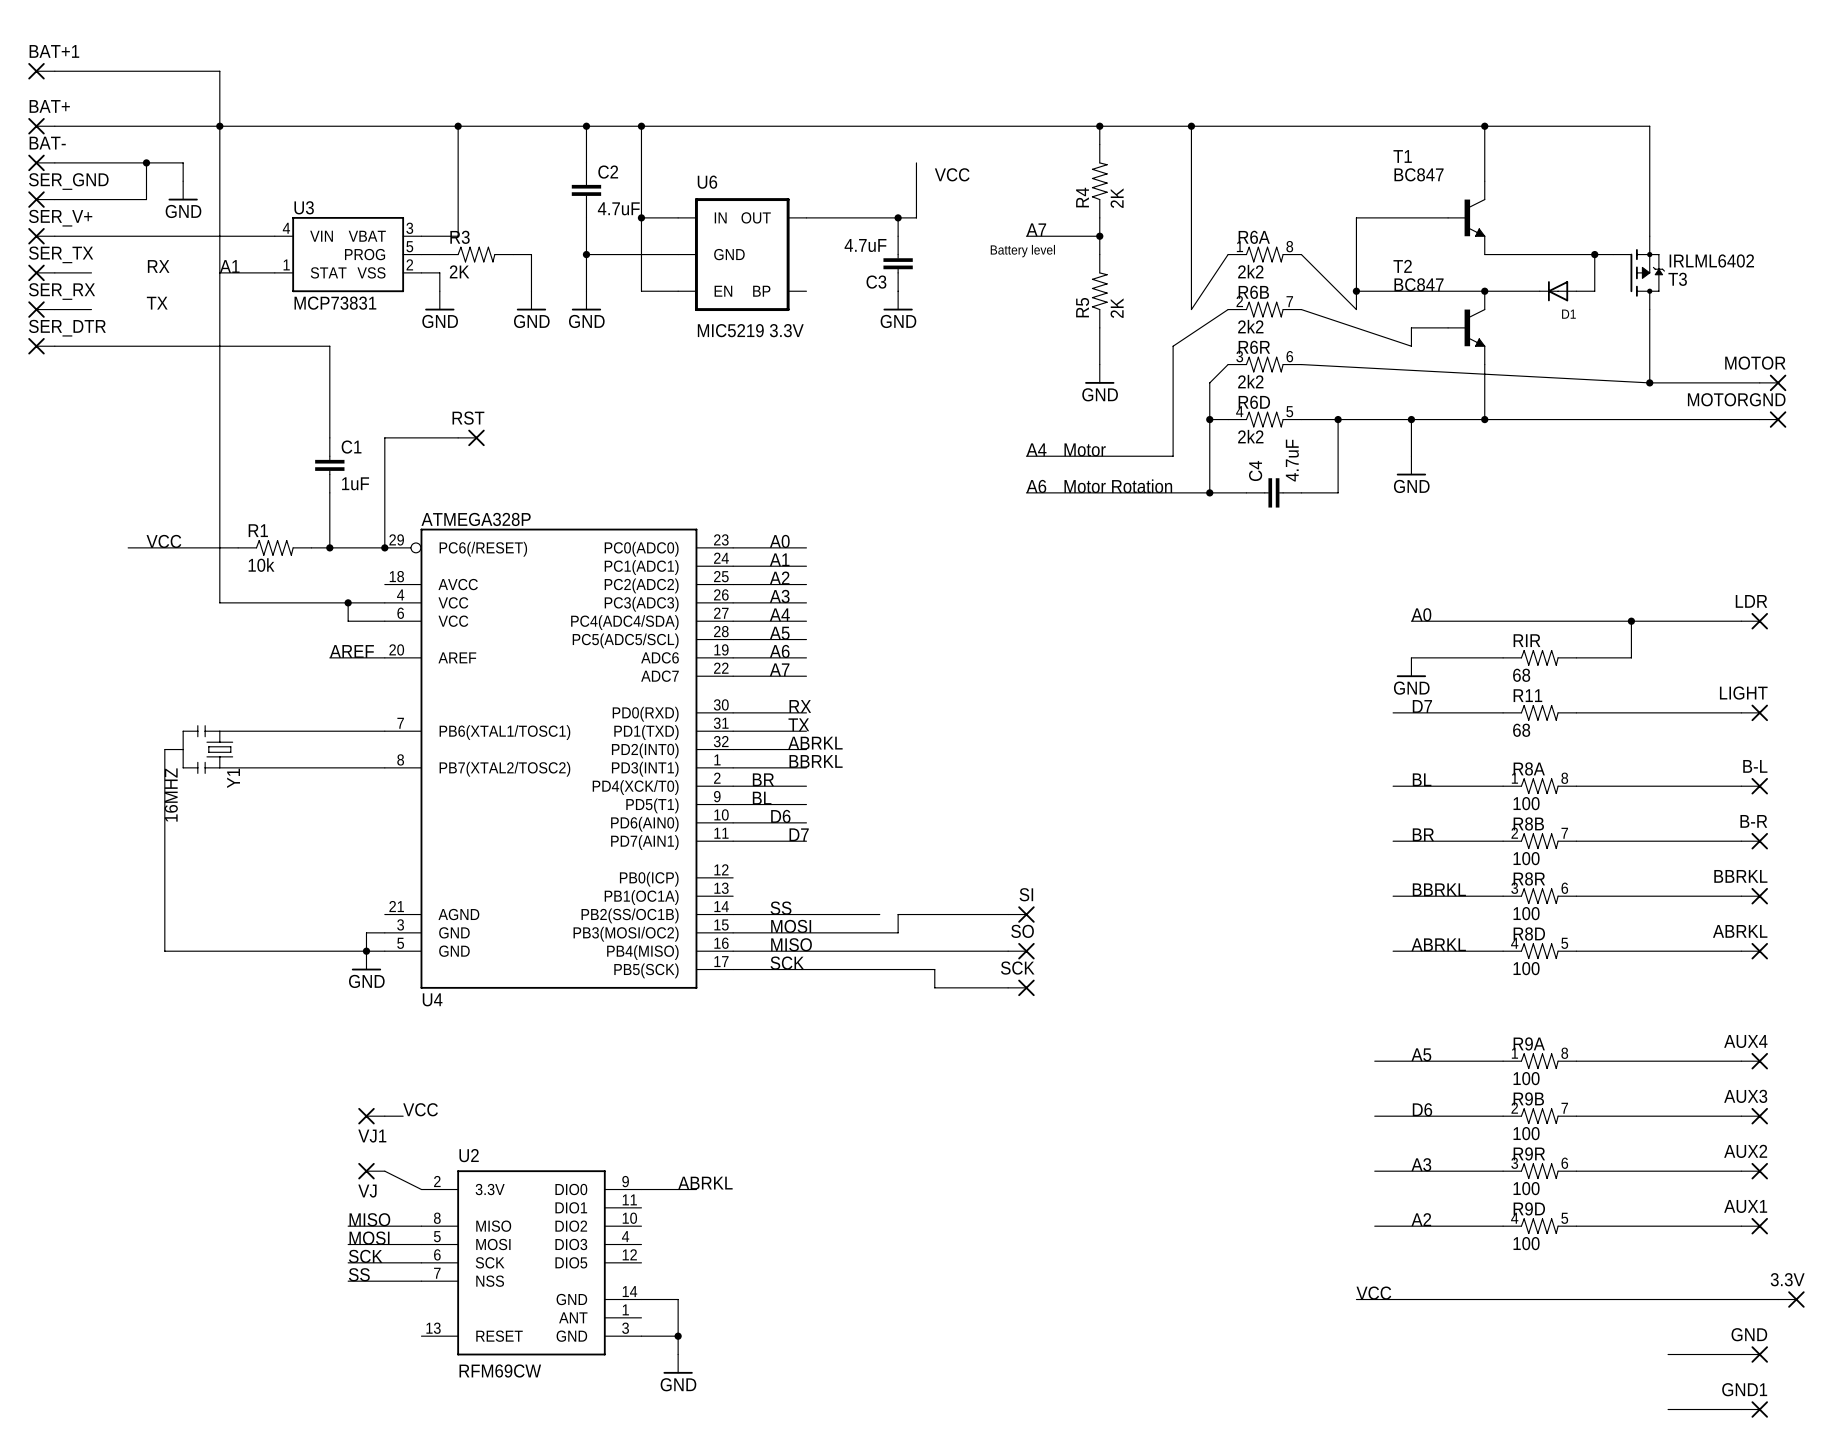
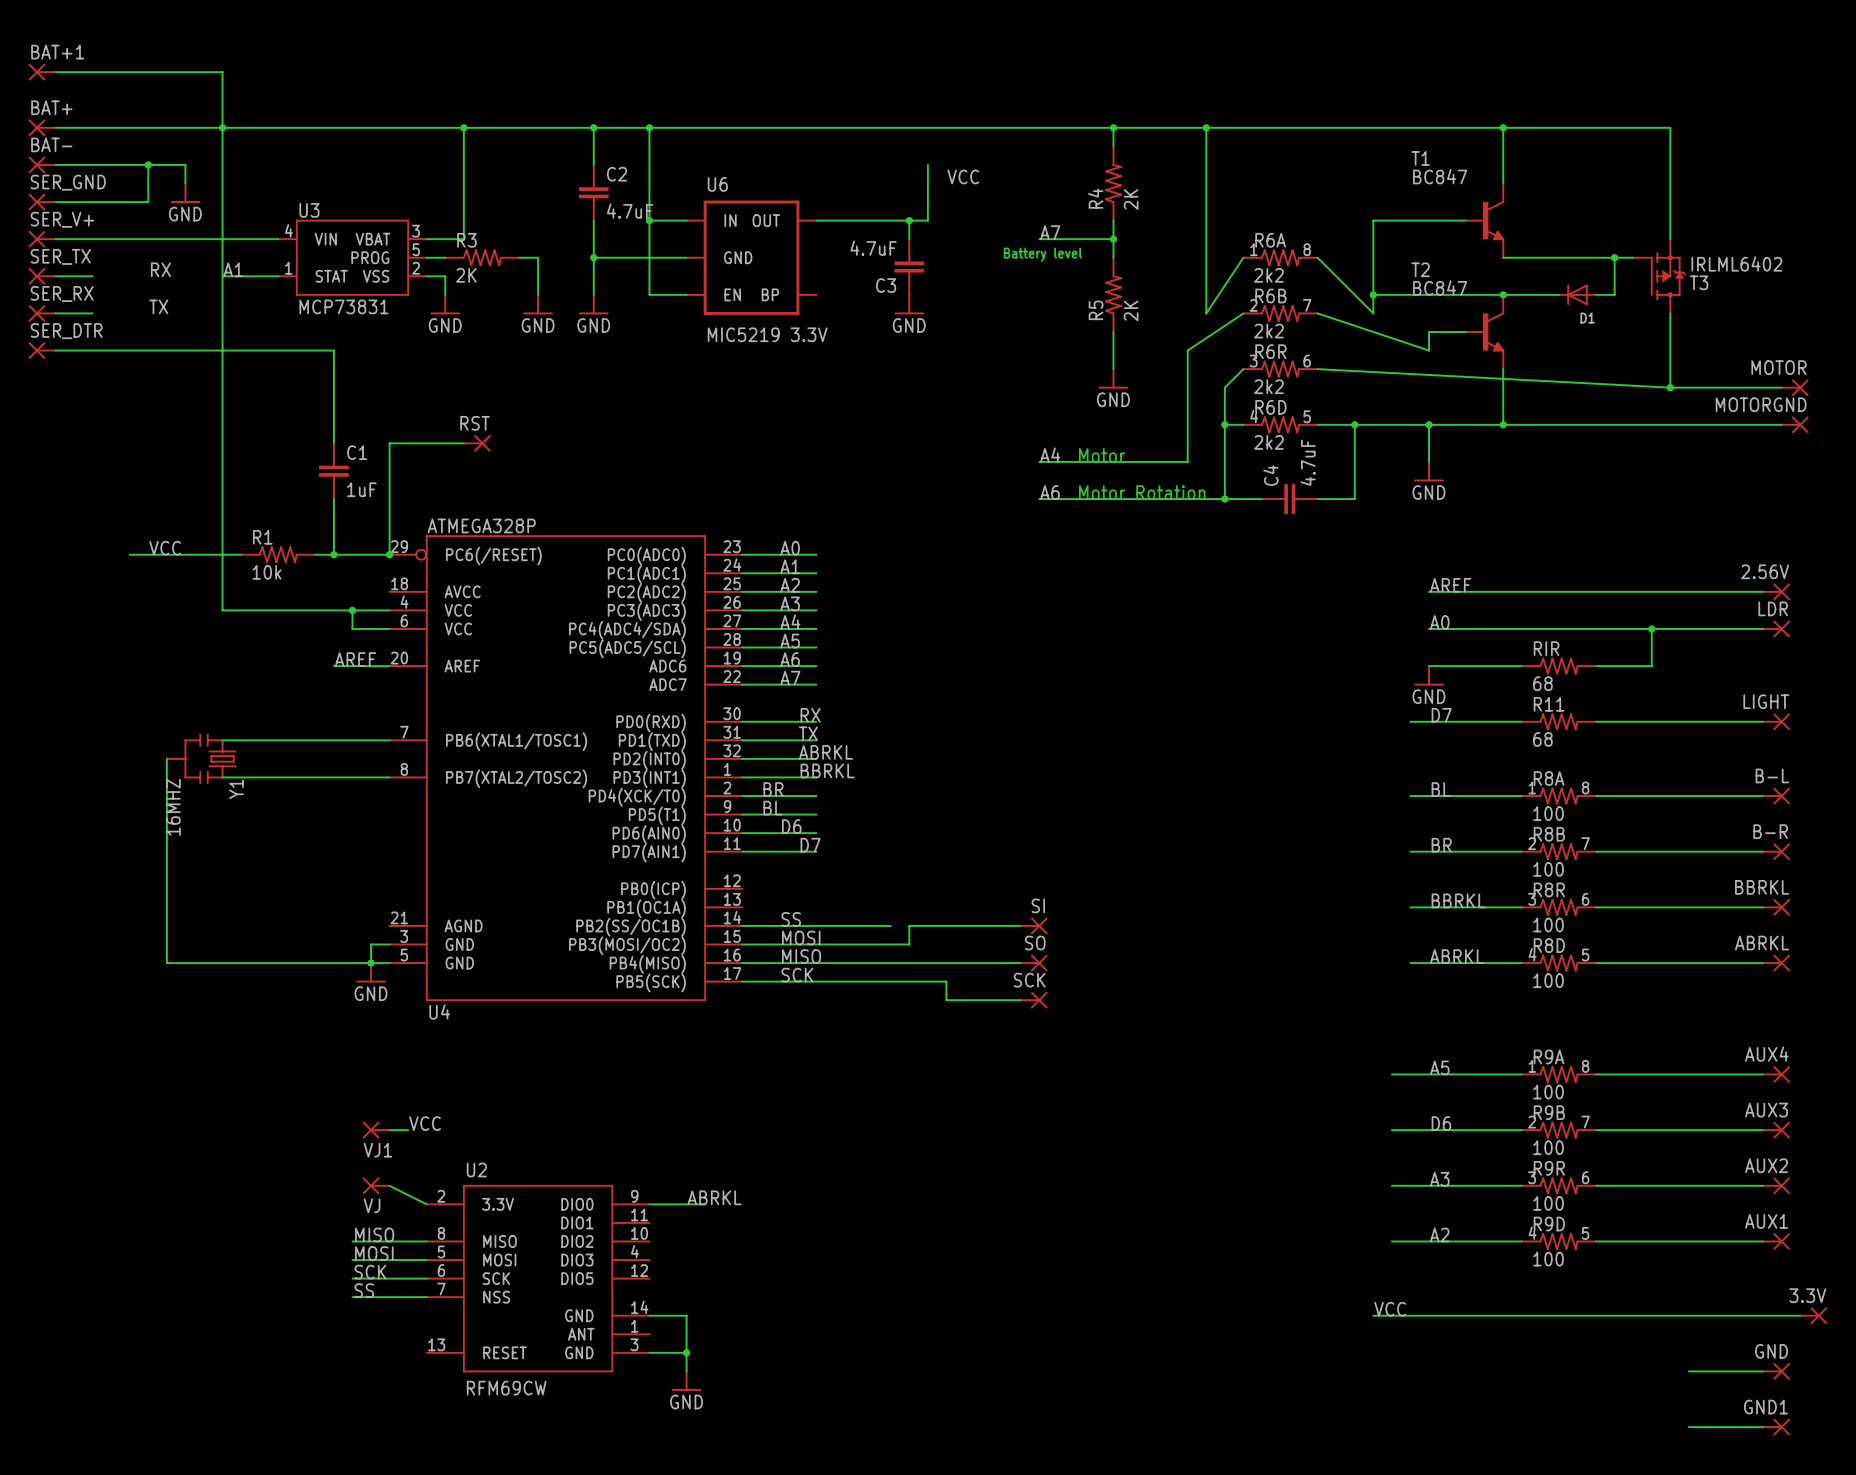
label: none -> AREF (1450, 585)
wire: none -> (1429, 591) (1763, 591)
2.56V: none -> (1776, 591)

